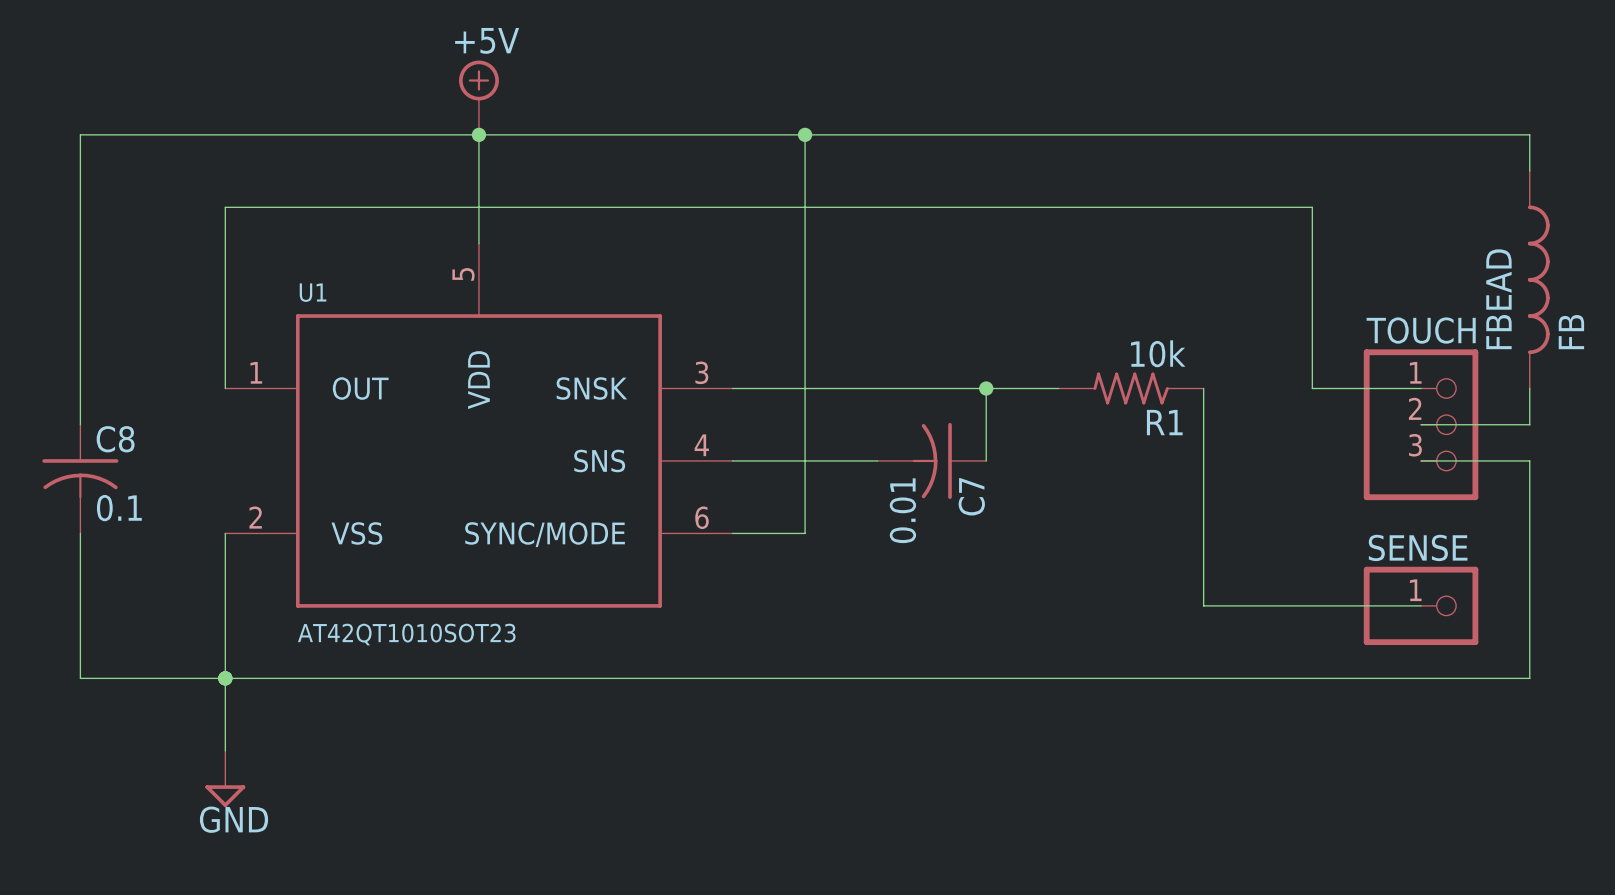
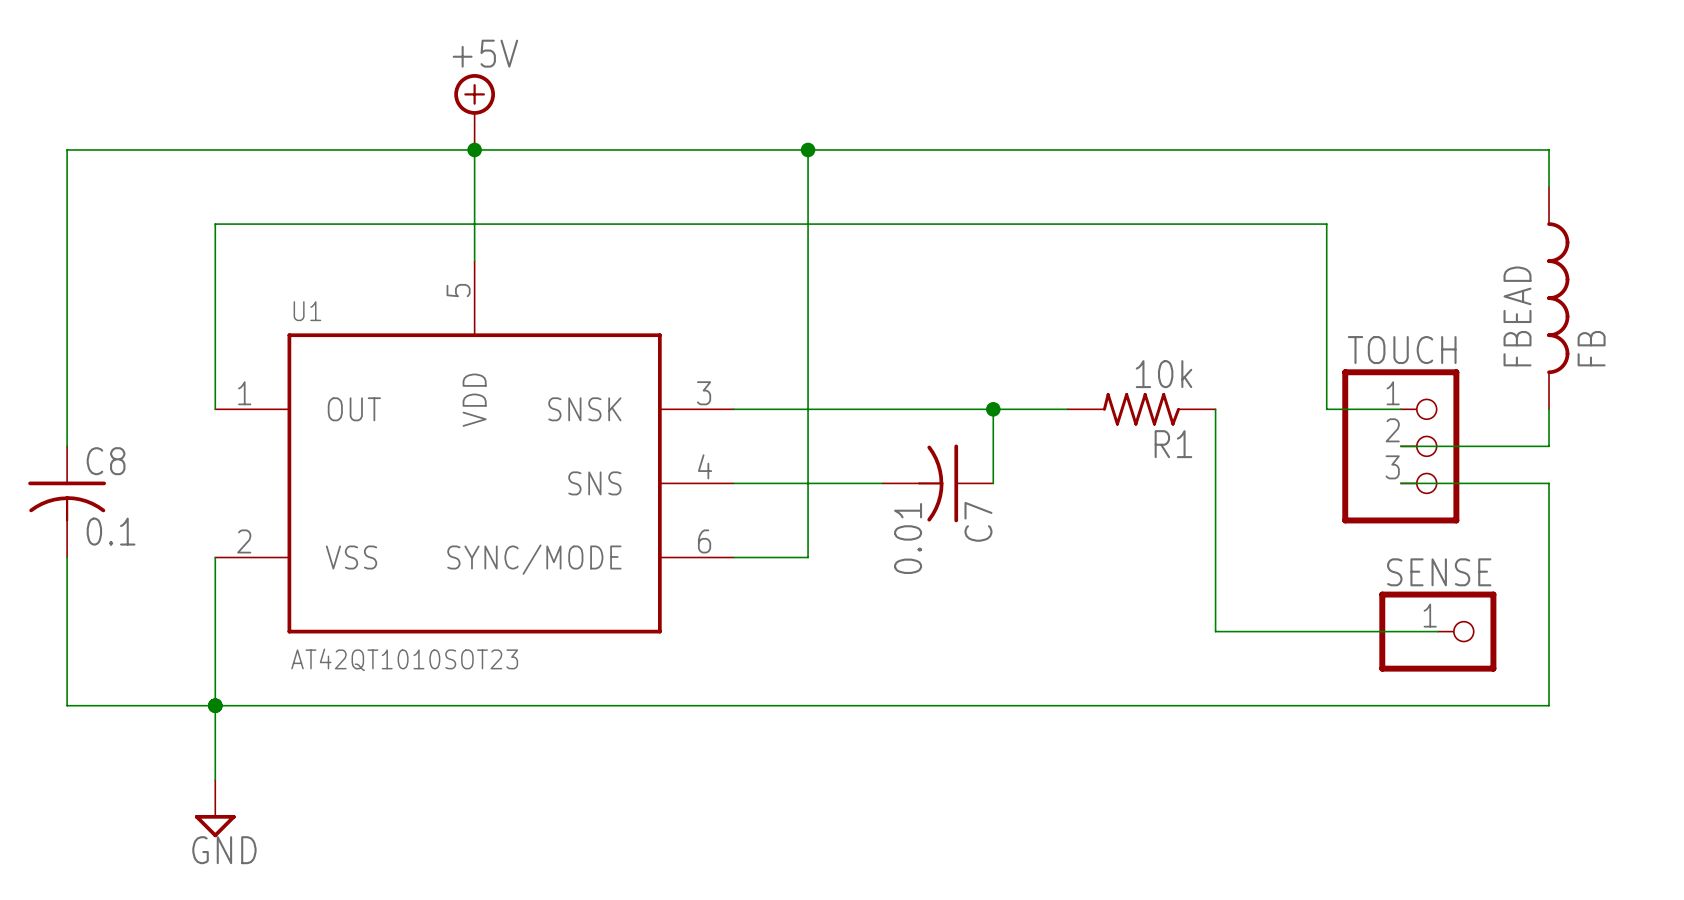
wire: (1384, 388) (1421, 388) -> (1400, 446) (1437, 446)
TOUCH position: (1421, 424) -> (1400, 446)
wire: none -> (1400, 483) (1437, 483)

